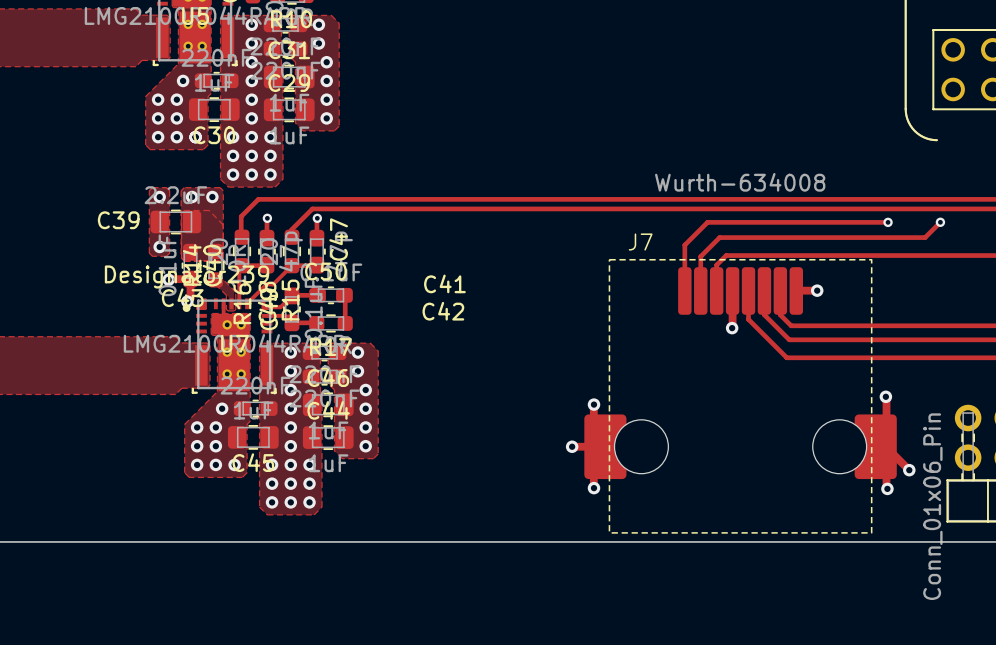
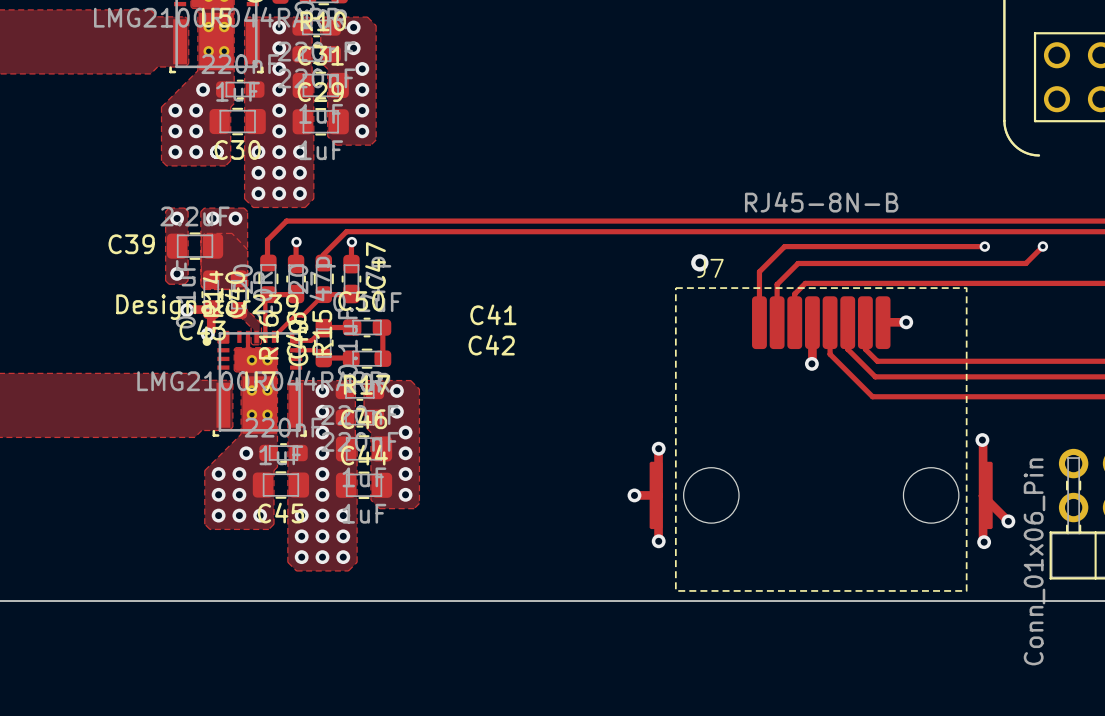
J7 value: Wurth-634008 (740, 182) -> RJ45-8N-B (821, 202)
via: none -> (699, 262)
J7 footprint: [584, 258, 897, 534] -> [649, 287, 993, 592]

